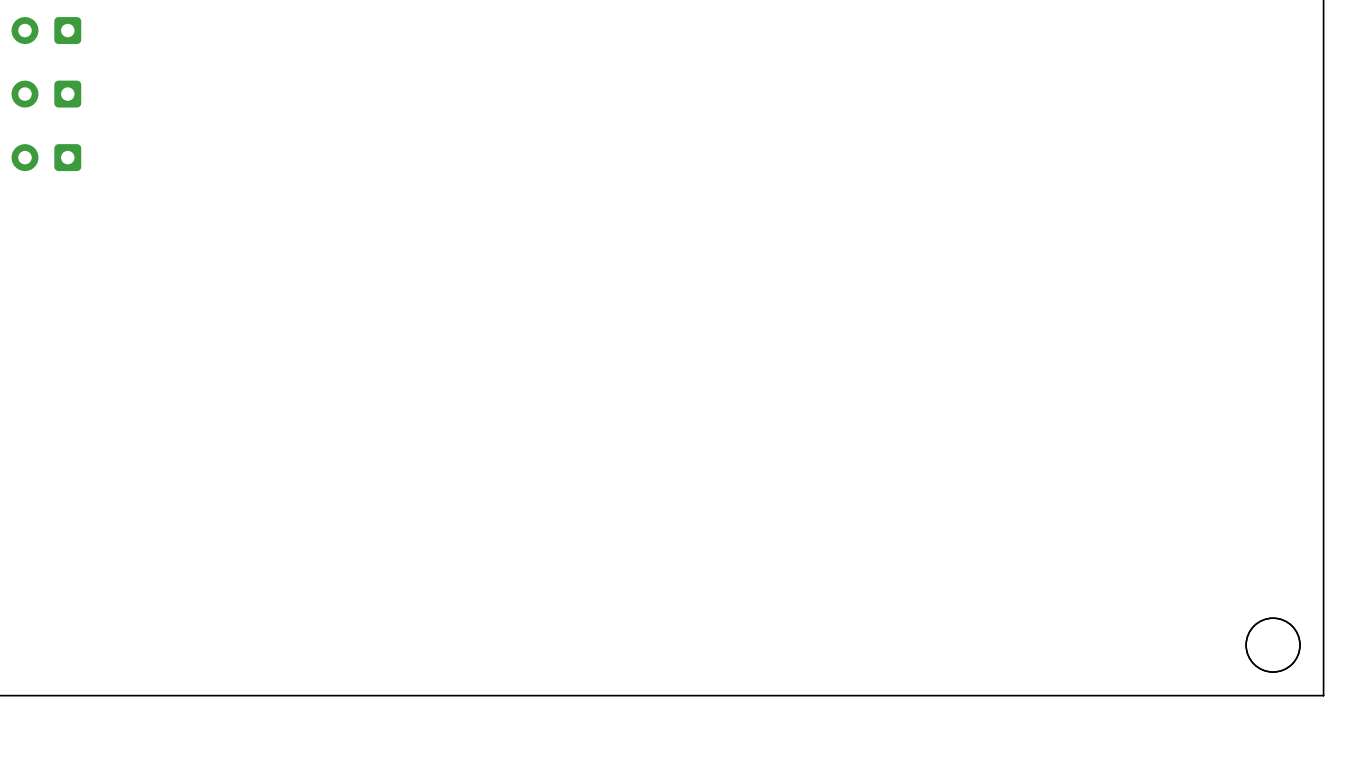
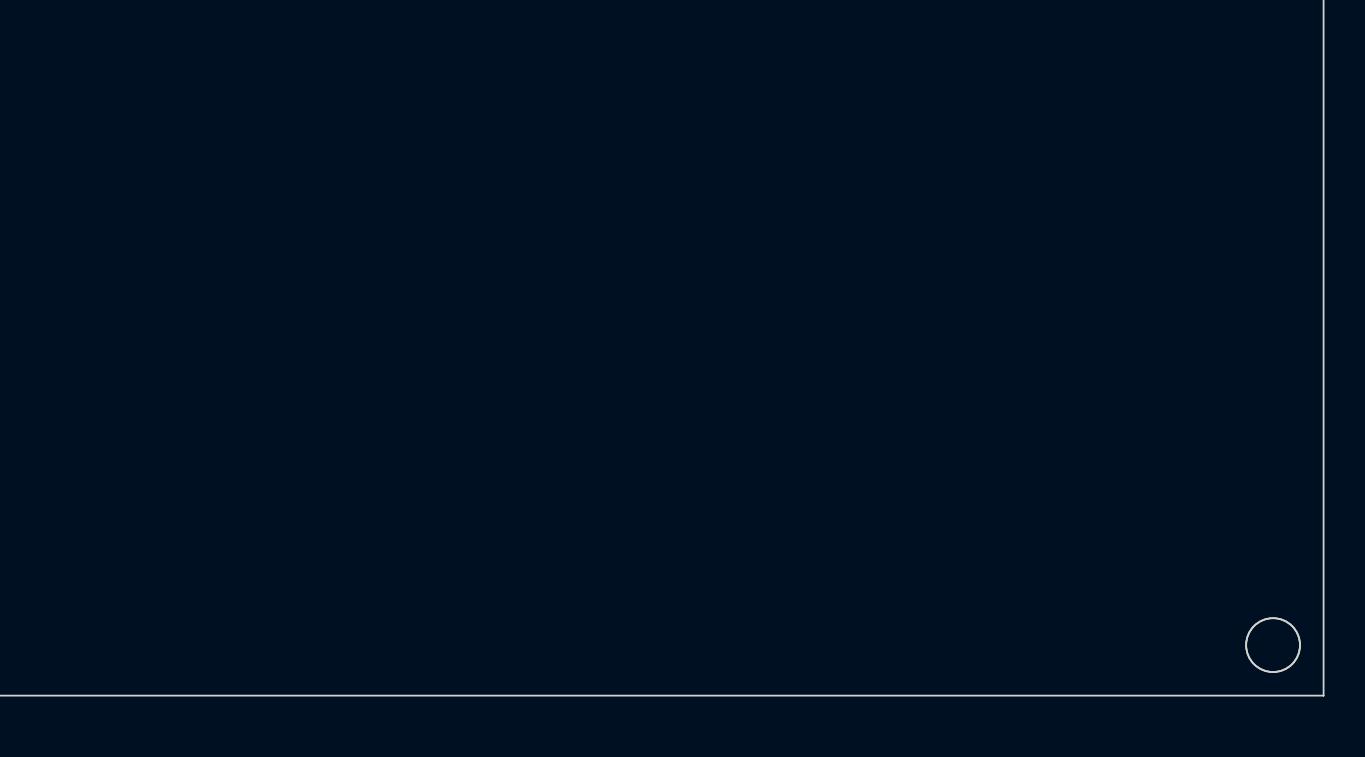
part: (46, 30) -> none
part: (46, 94) -> none
part: (46, 157) -> none

